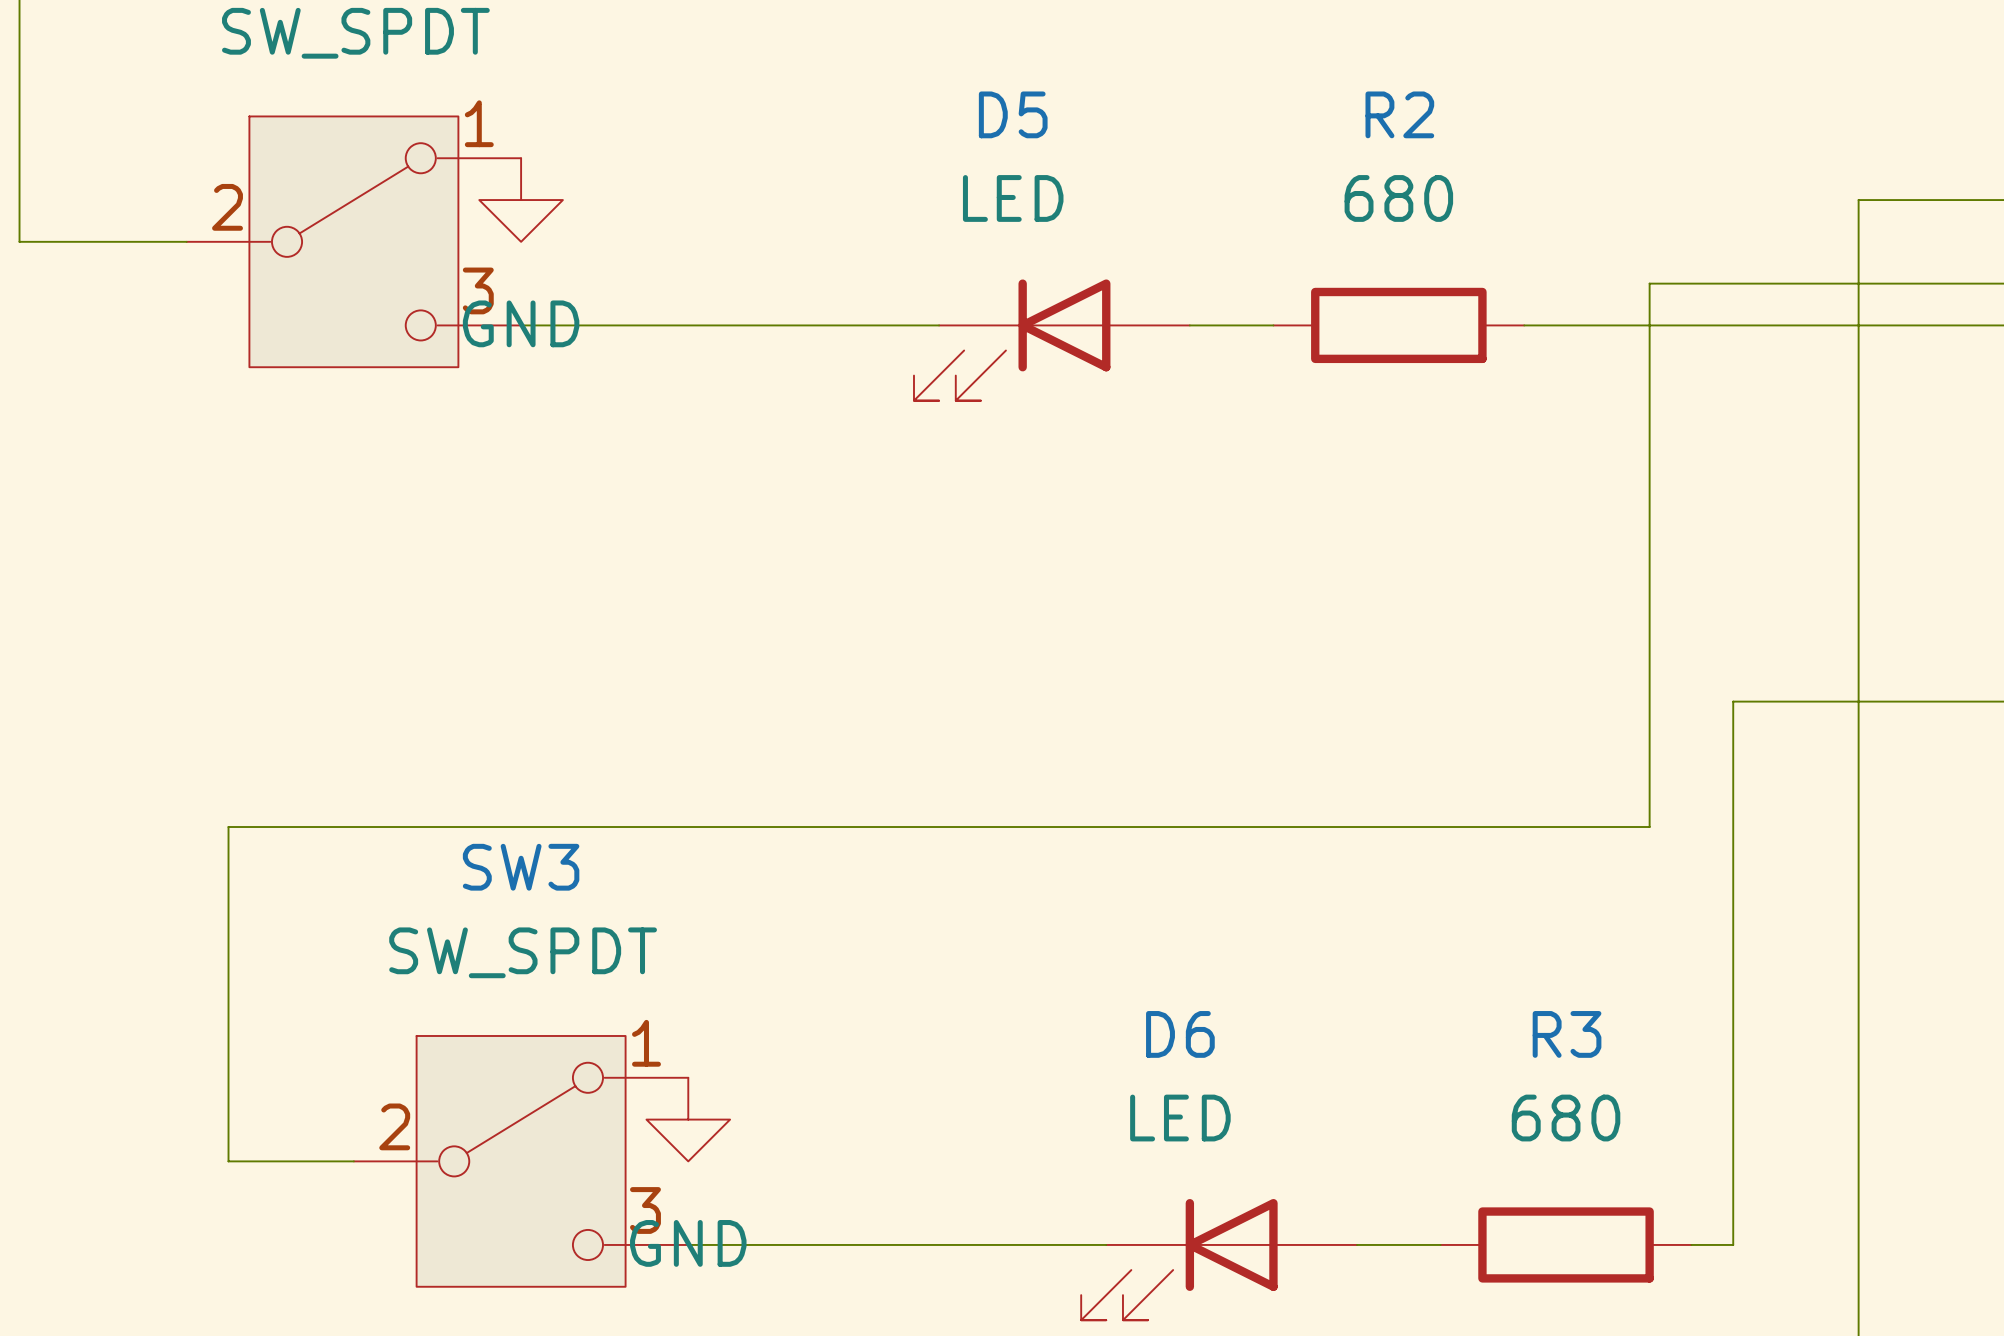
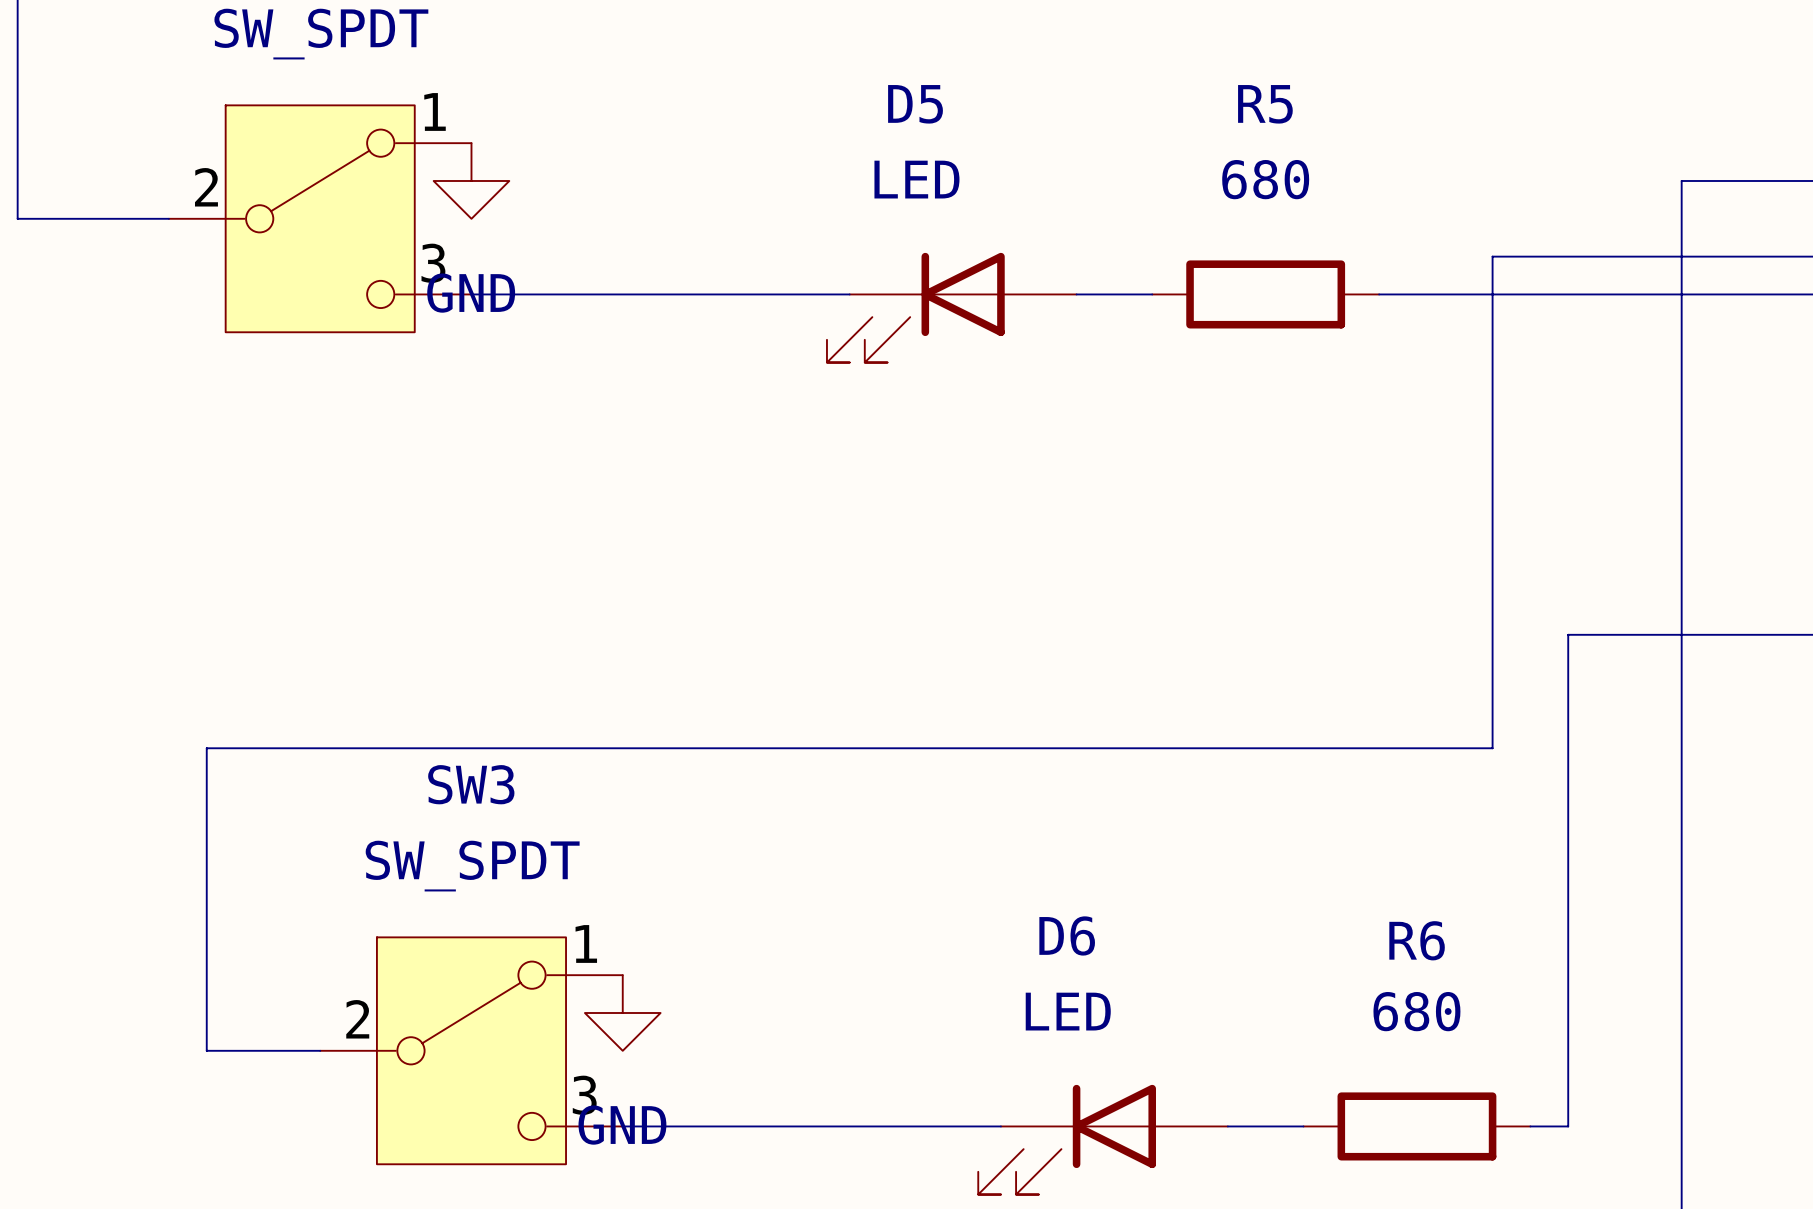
R2 name: R2 (1399, 114) -> R5 (1265, 104)
R3 name: R3 (1567, 1034) -> R6 (1417, 940)

